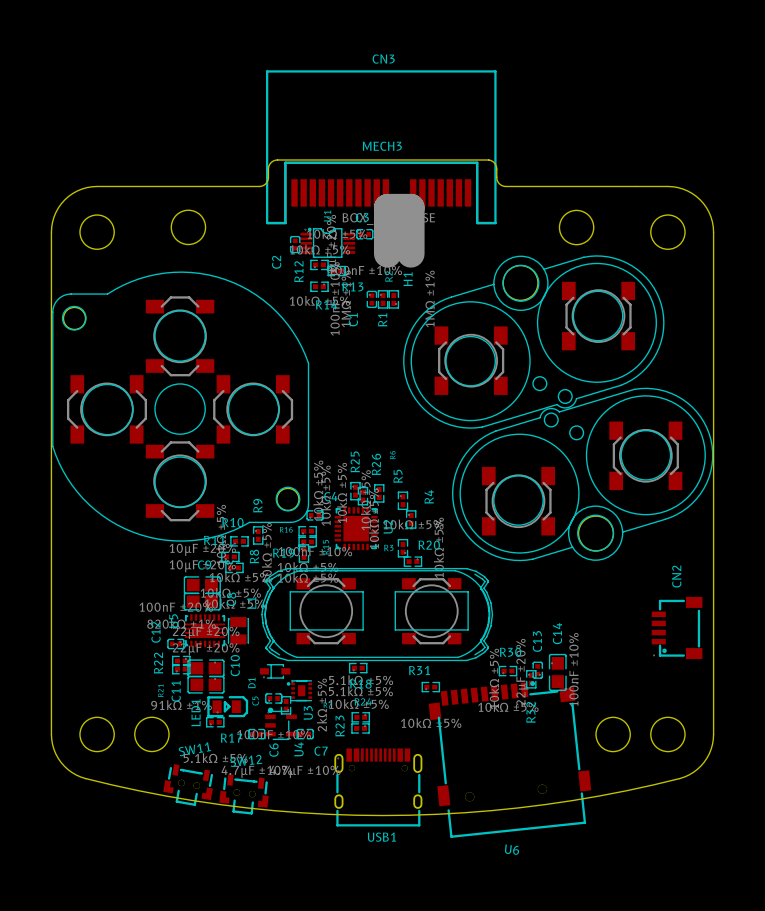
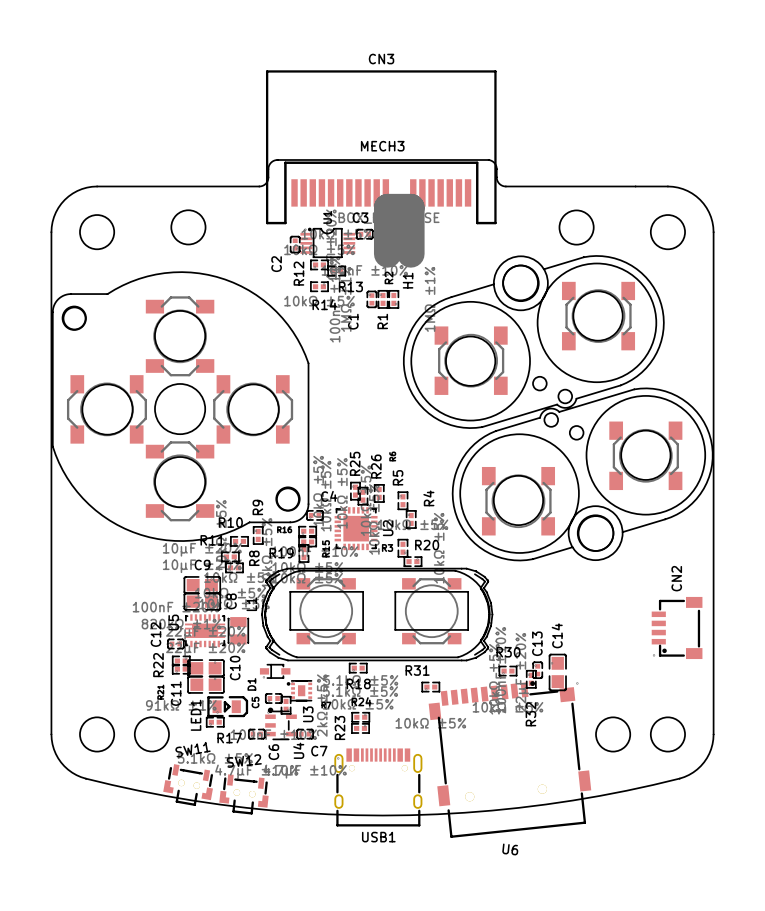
C13 rotation: 0° (537, 670) -> 180° (537, 670)

